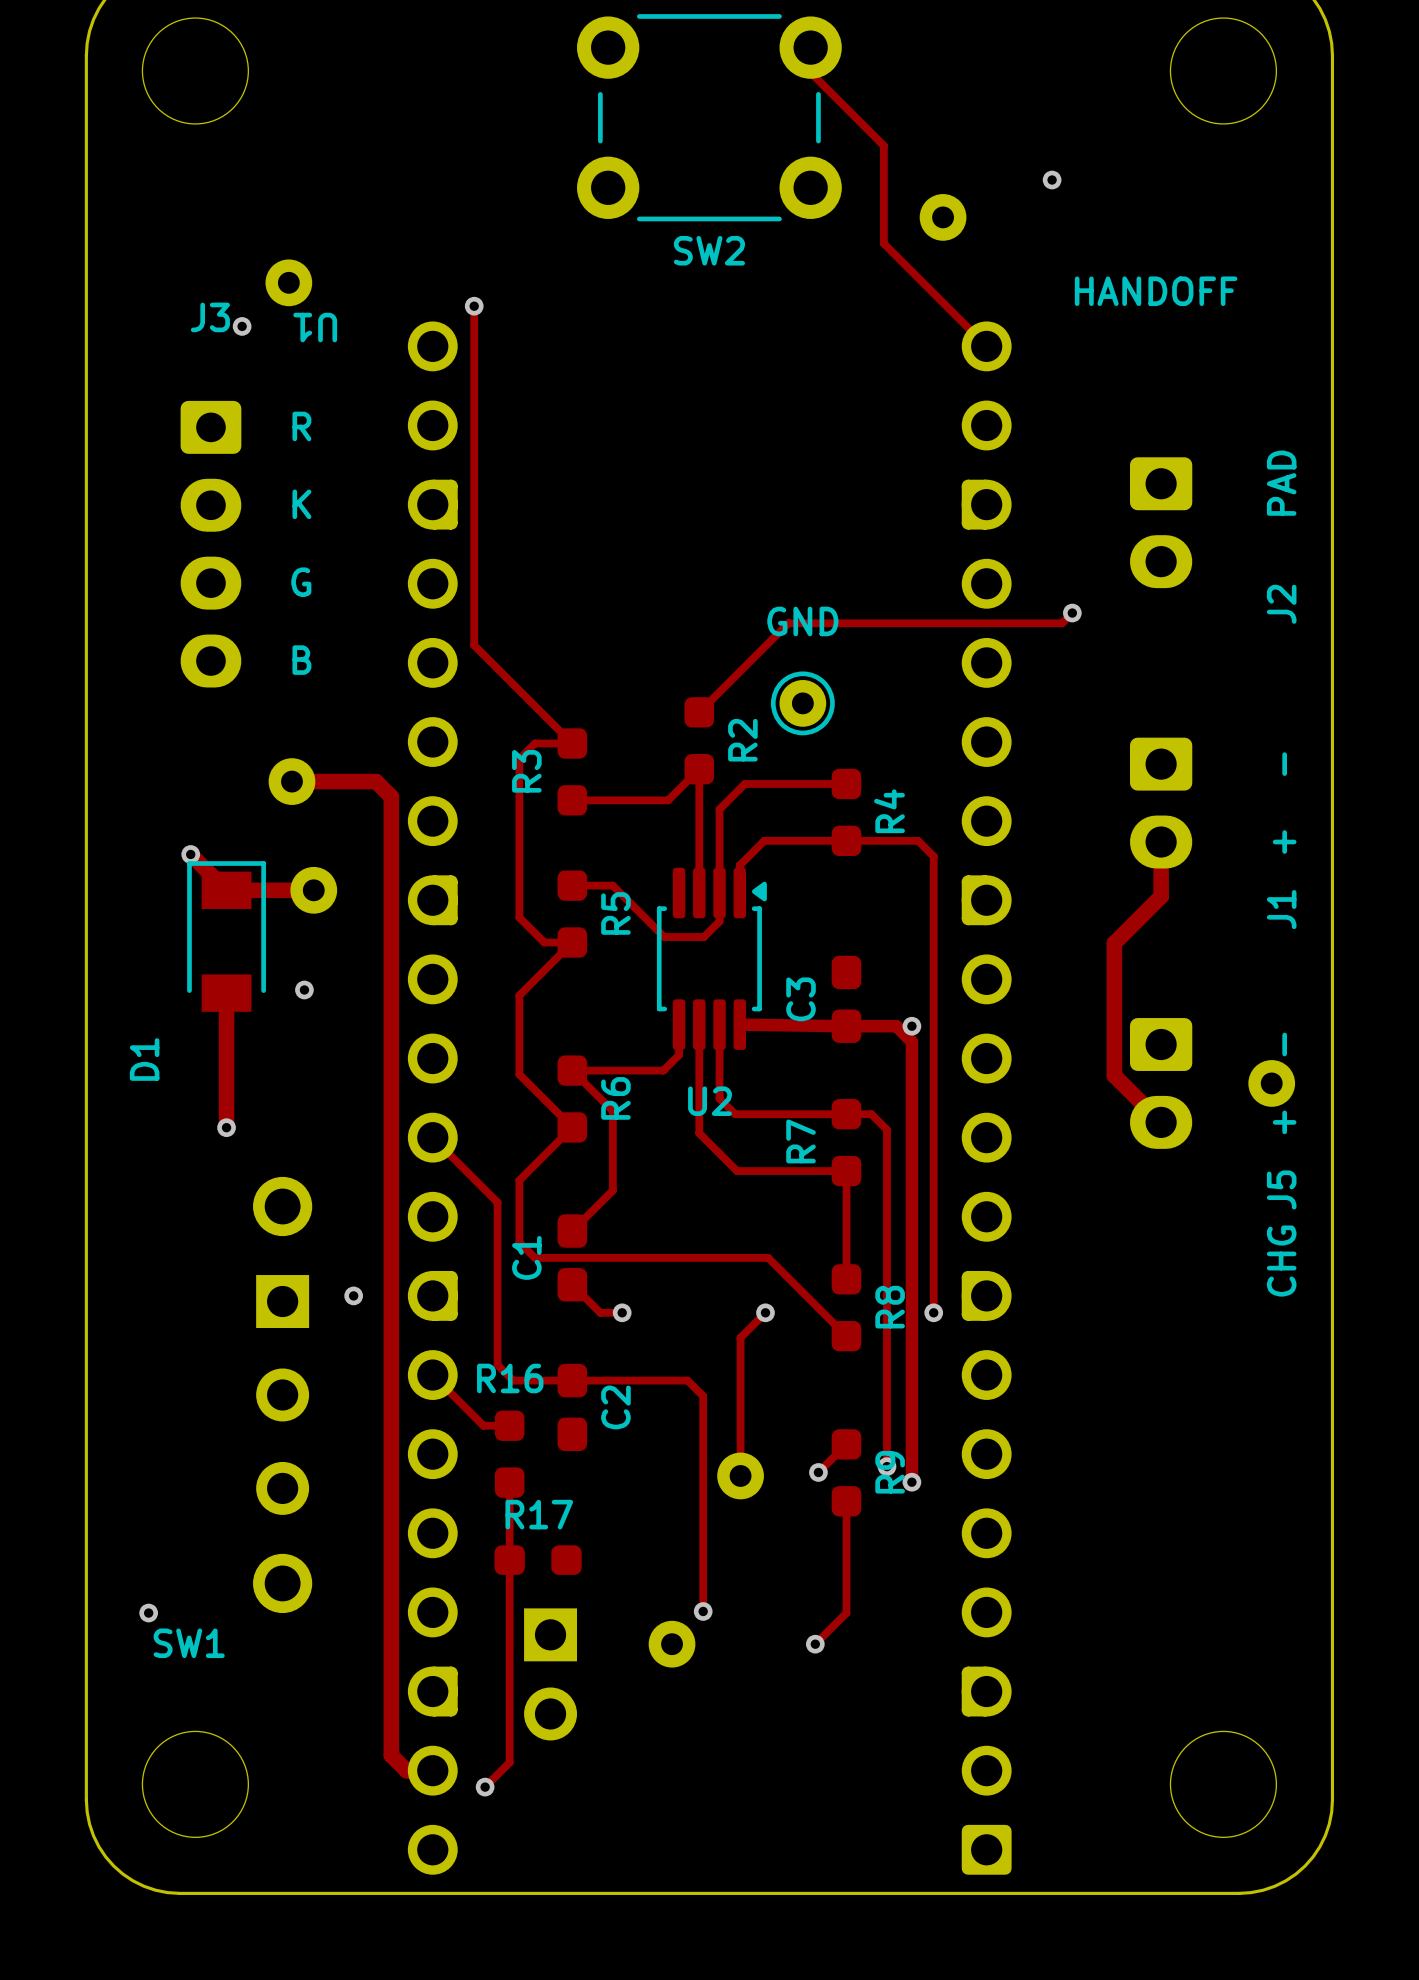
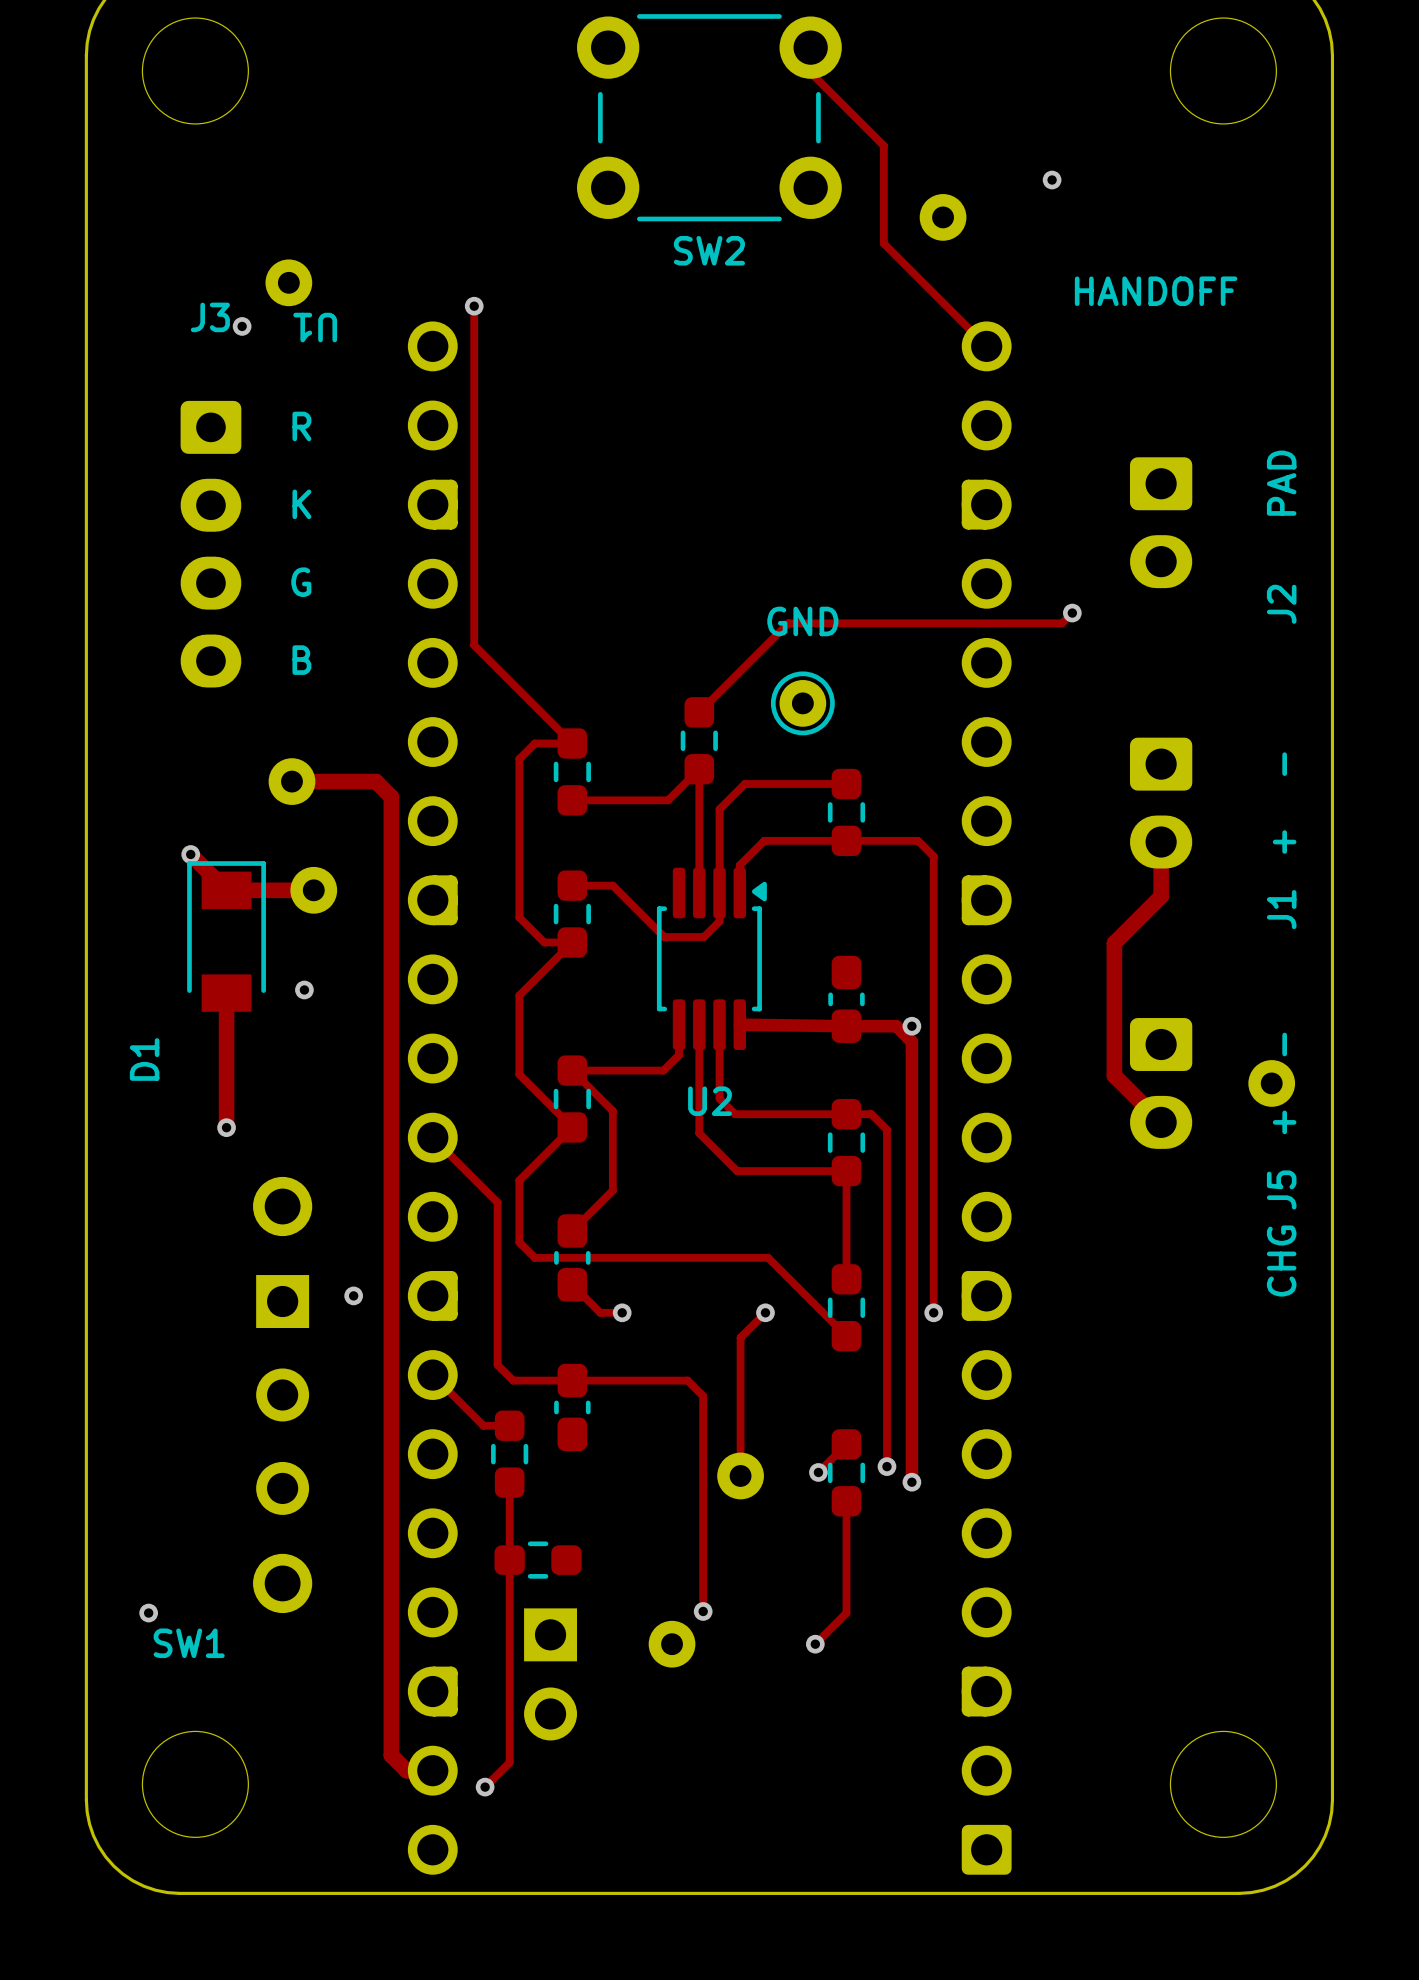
R2: (699, 740) -> none
part: none -> (699, 740)
R3: (572, 771) -> none
part: none -> (572, 771)
R4: (846, 812) -> none
part: none -> (846, 812)
R5: (572, 914) -> none
part: none -> (572, 914)
C3: (846, 999) -> none
part: none -> (846, 999)
R6: (572, 1099) -> none
part: none -> (572, 1099)
R7: (846, 1142) -> none
part: none -> (846, 1142)
C1: (572, 1257) -> none
part: none -> (572, 1257)
R8: (846, 1307) -> none
part: none -> (846, 1307)
C2: (572, 1407) -> none
part: none -> (572, 1407)
R16: (509, 1454) -> none
part: none -> (509, 1454)
R9: (846, 1472) -> none
part: none -> (846, 1472)
R17: (538, 1560) -> none
part: none -> (538, 1560)

